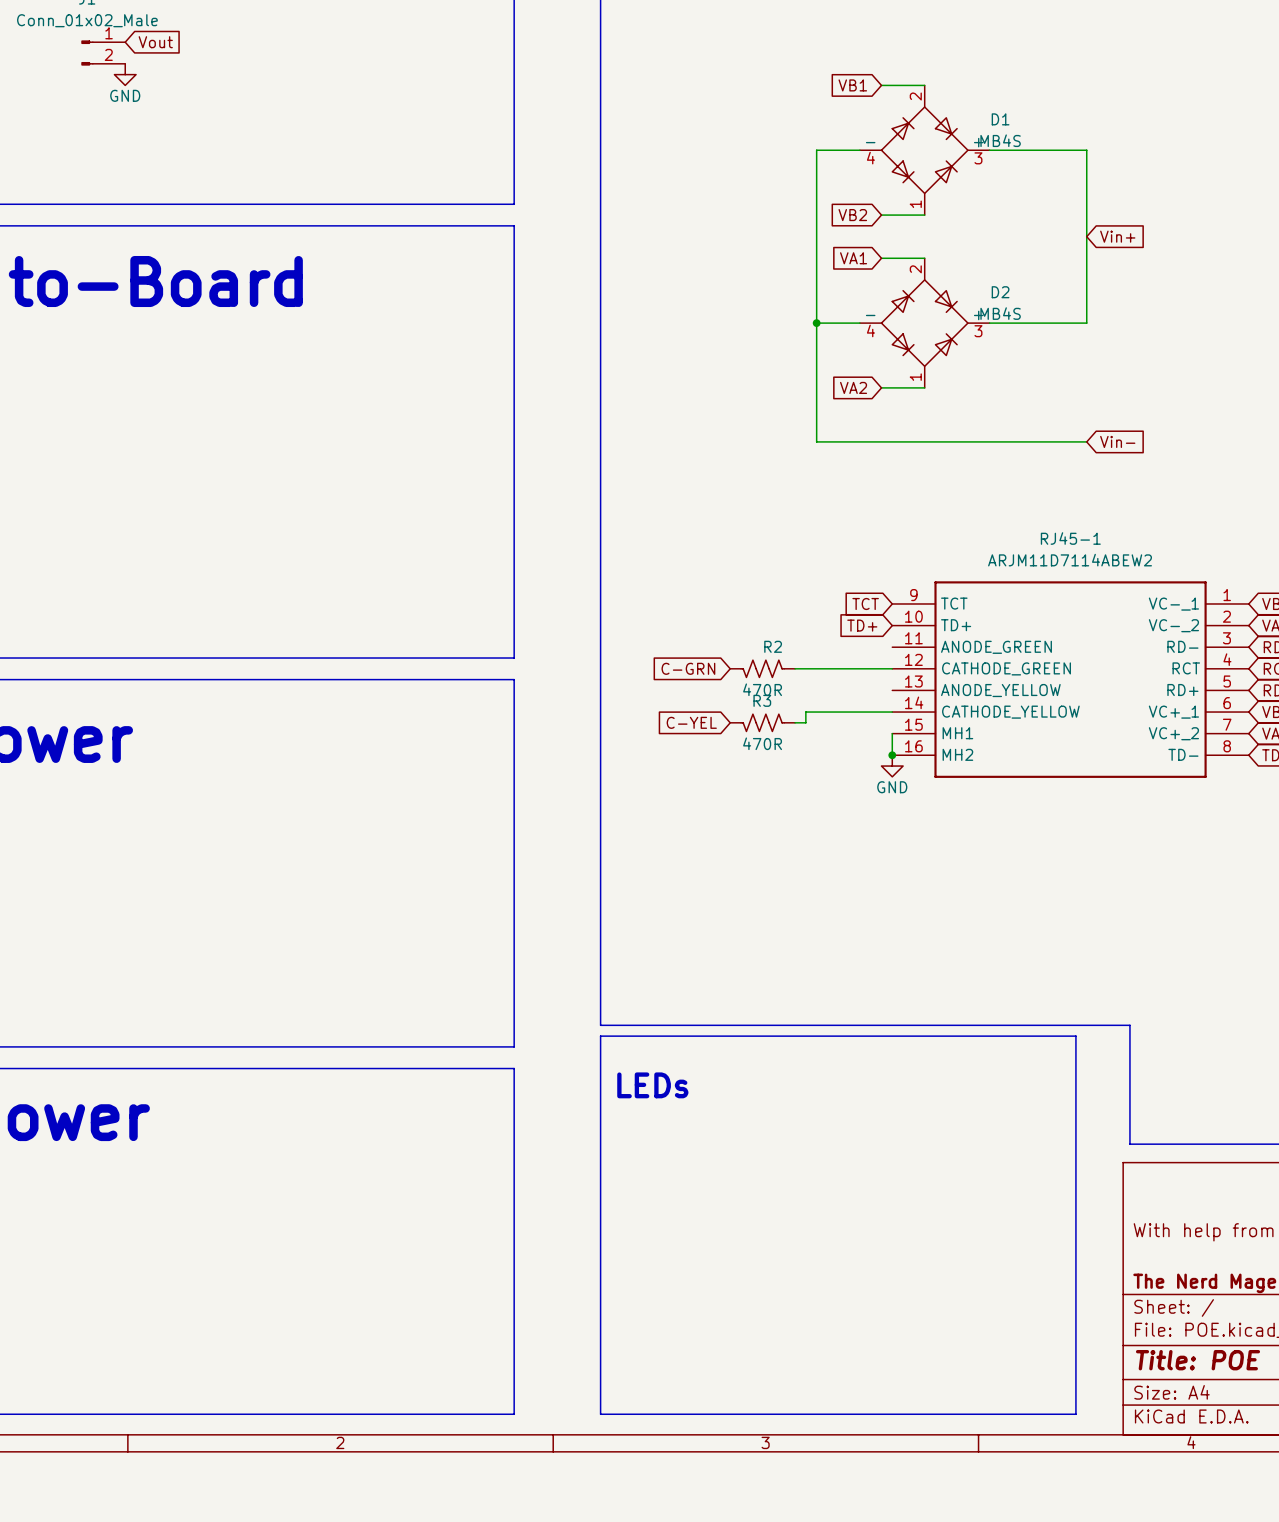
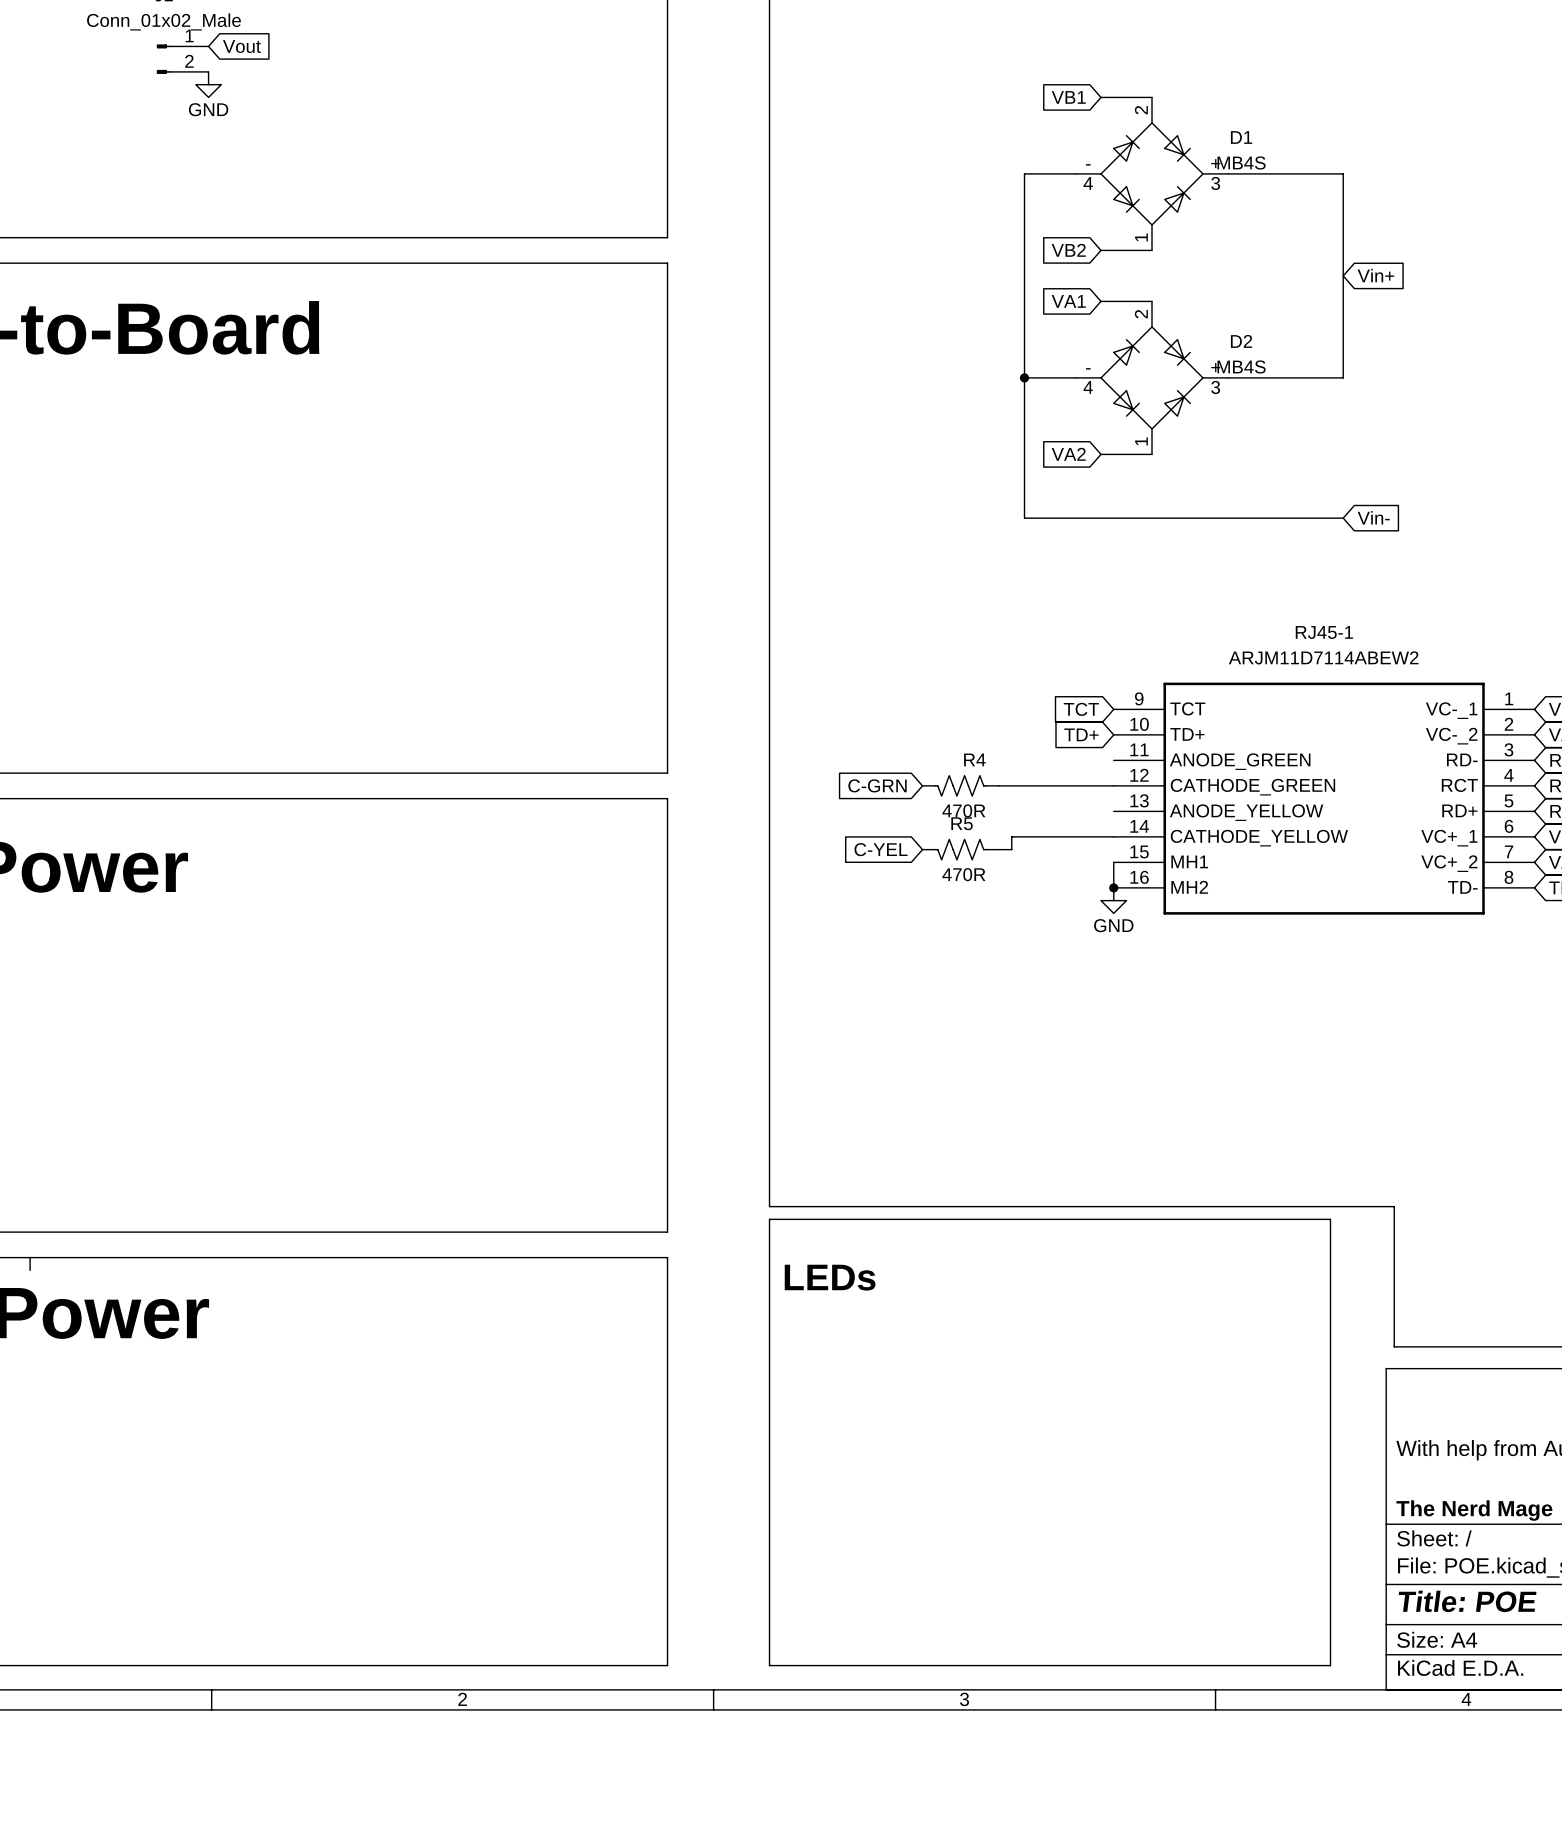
R2 name: R2 (773, 646) -> R4 (974, 759)
R3 name: R3 (762, 700) -> R5 (962, 823)

